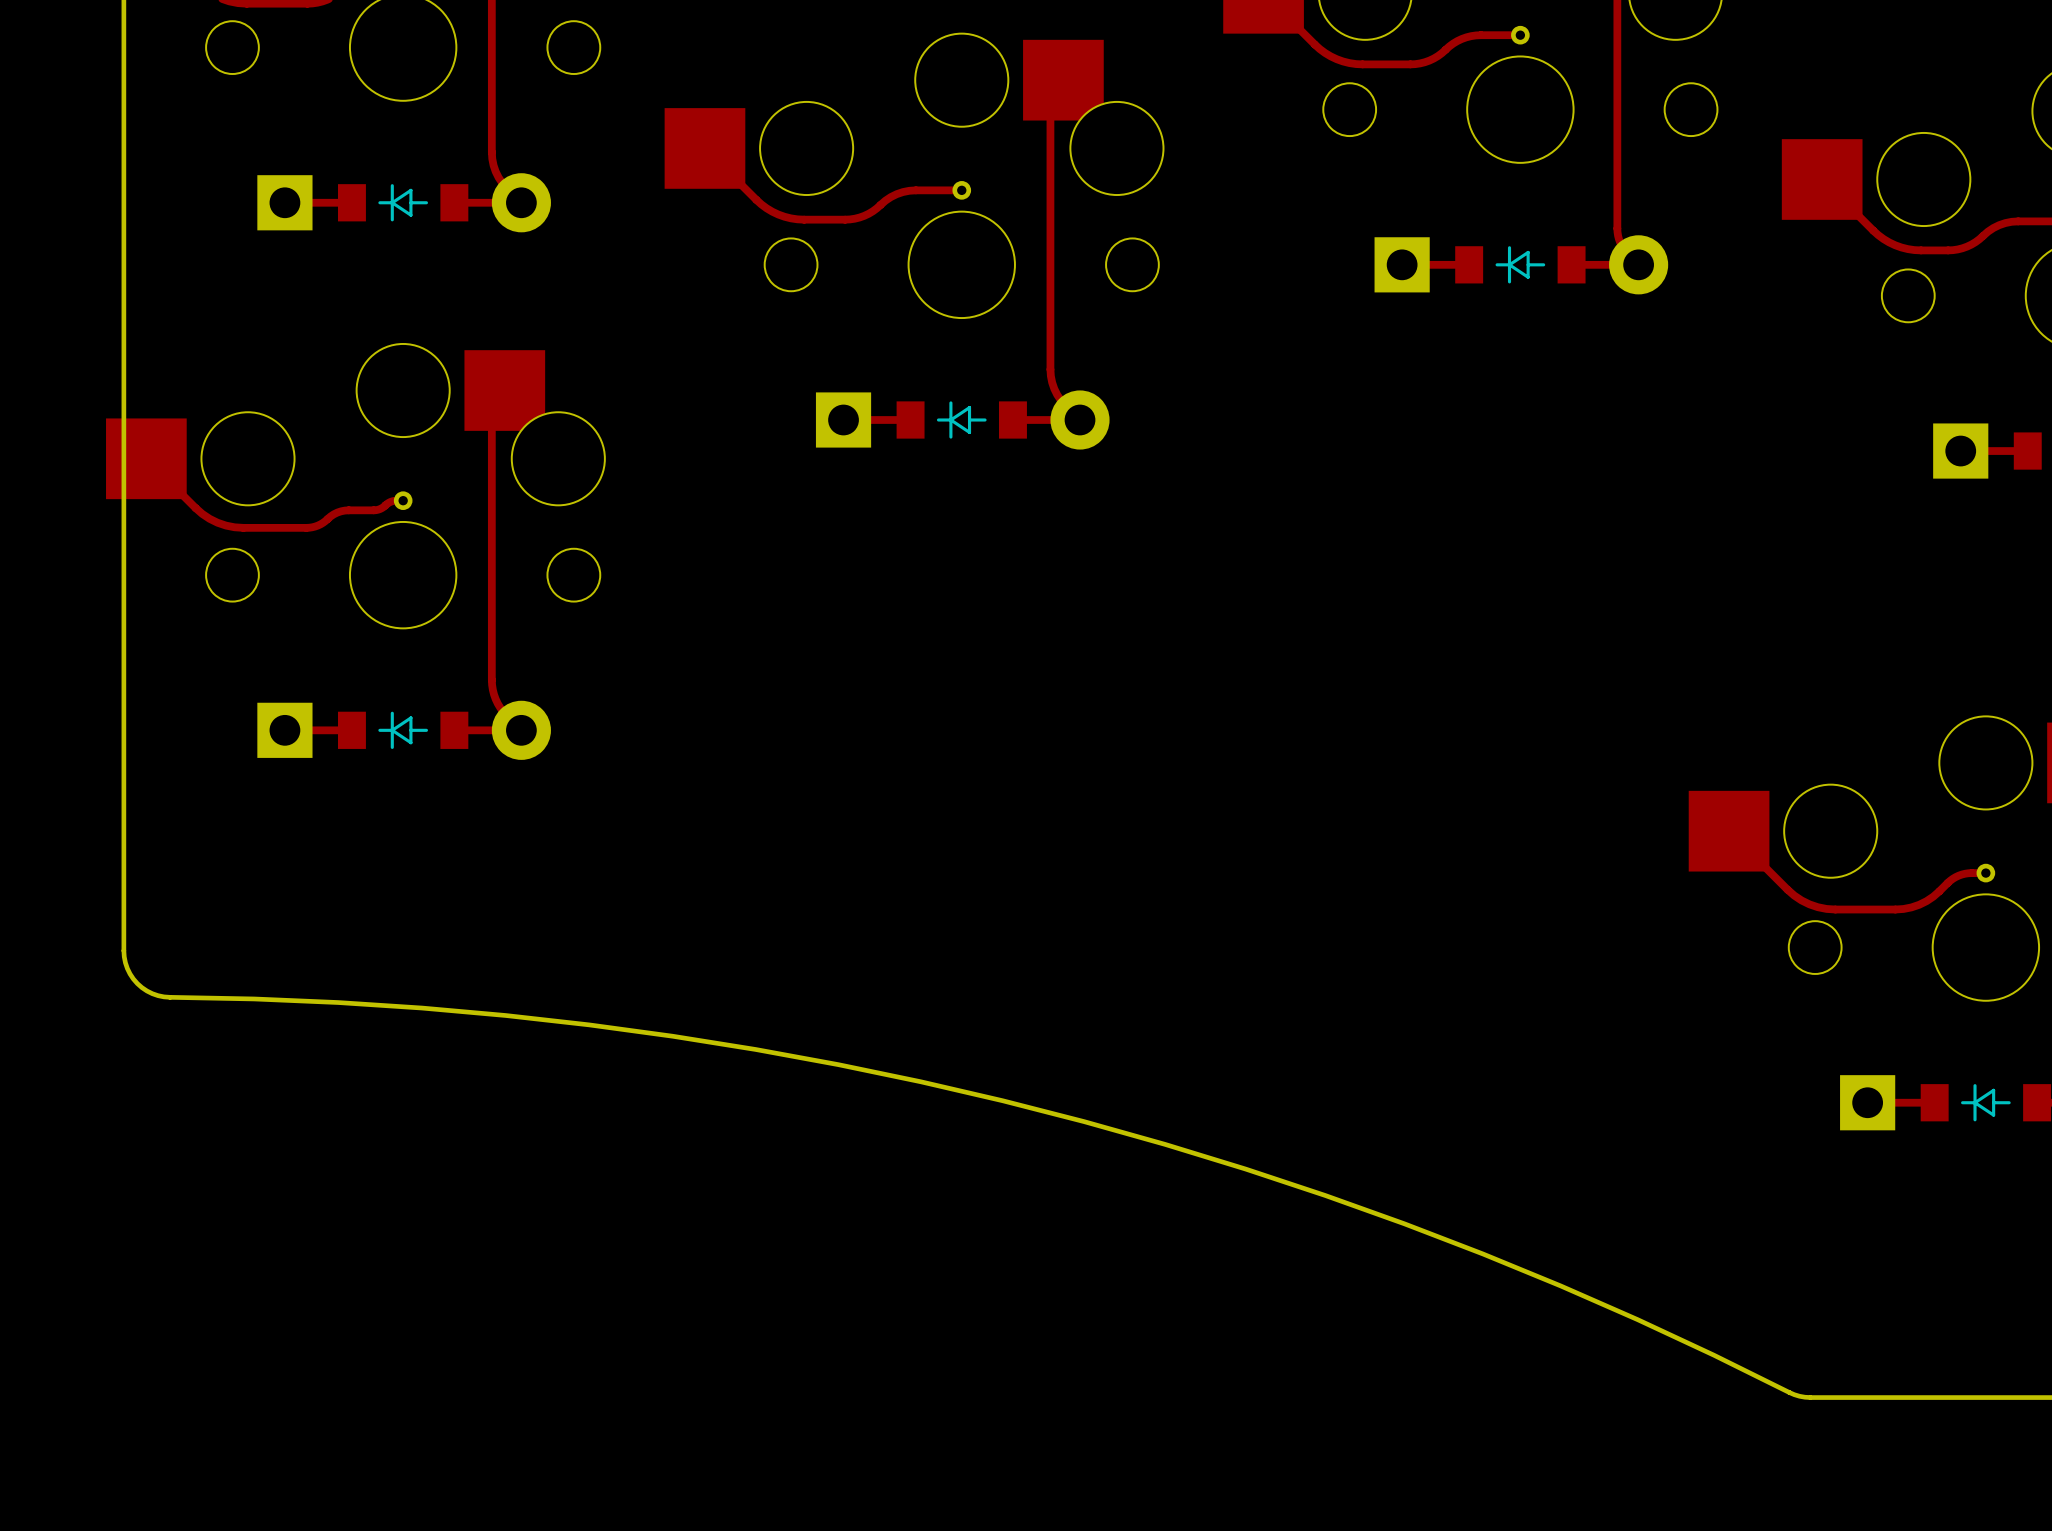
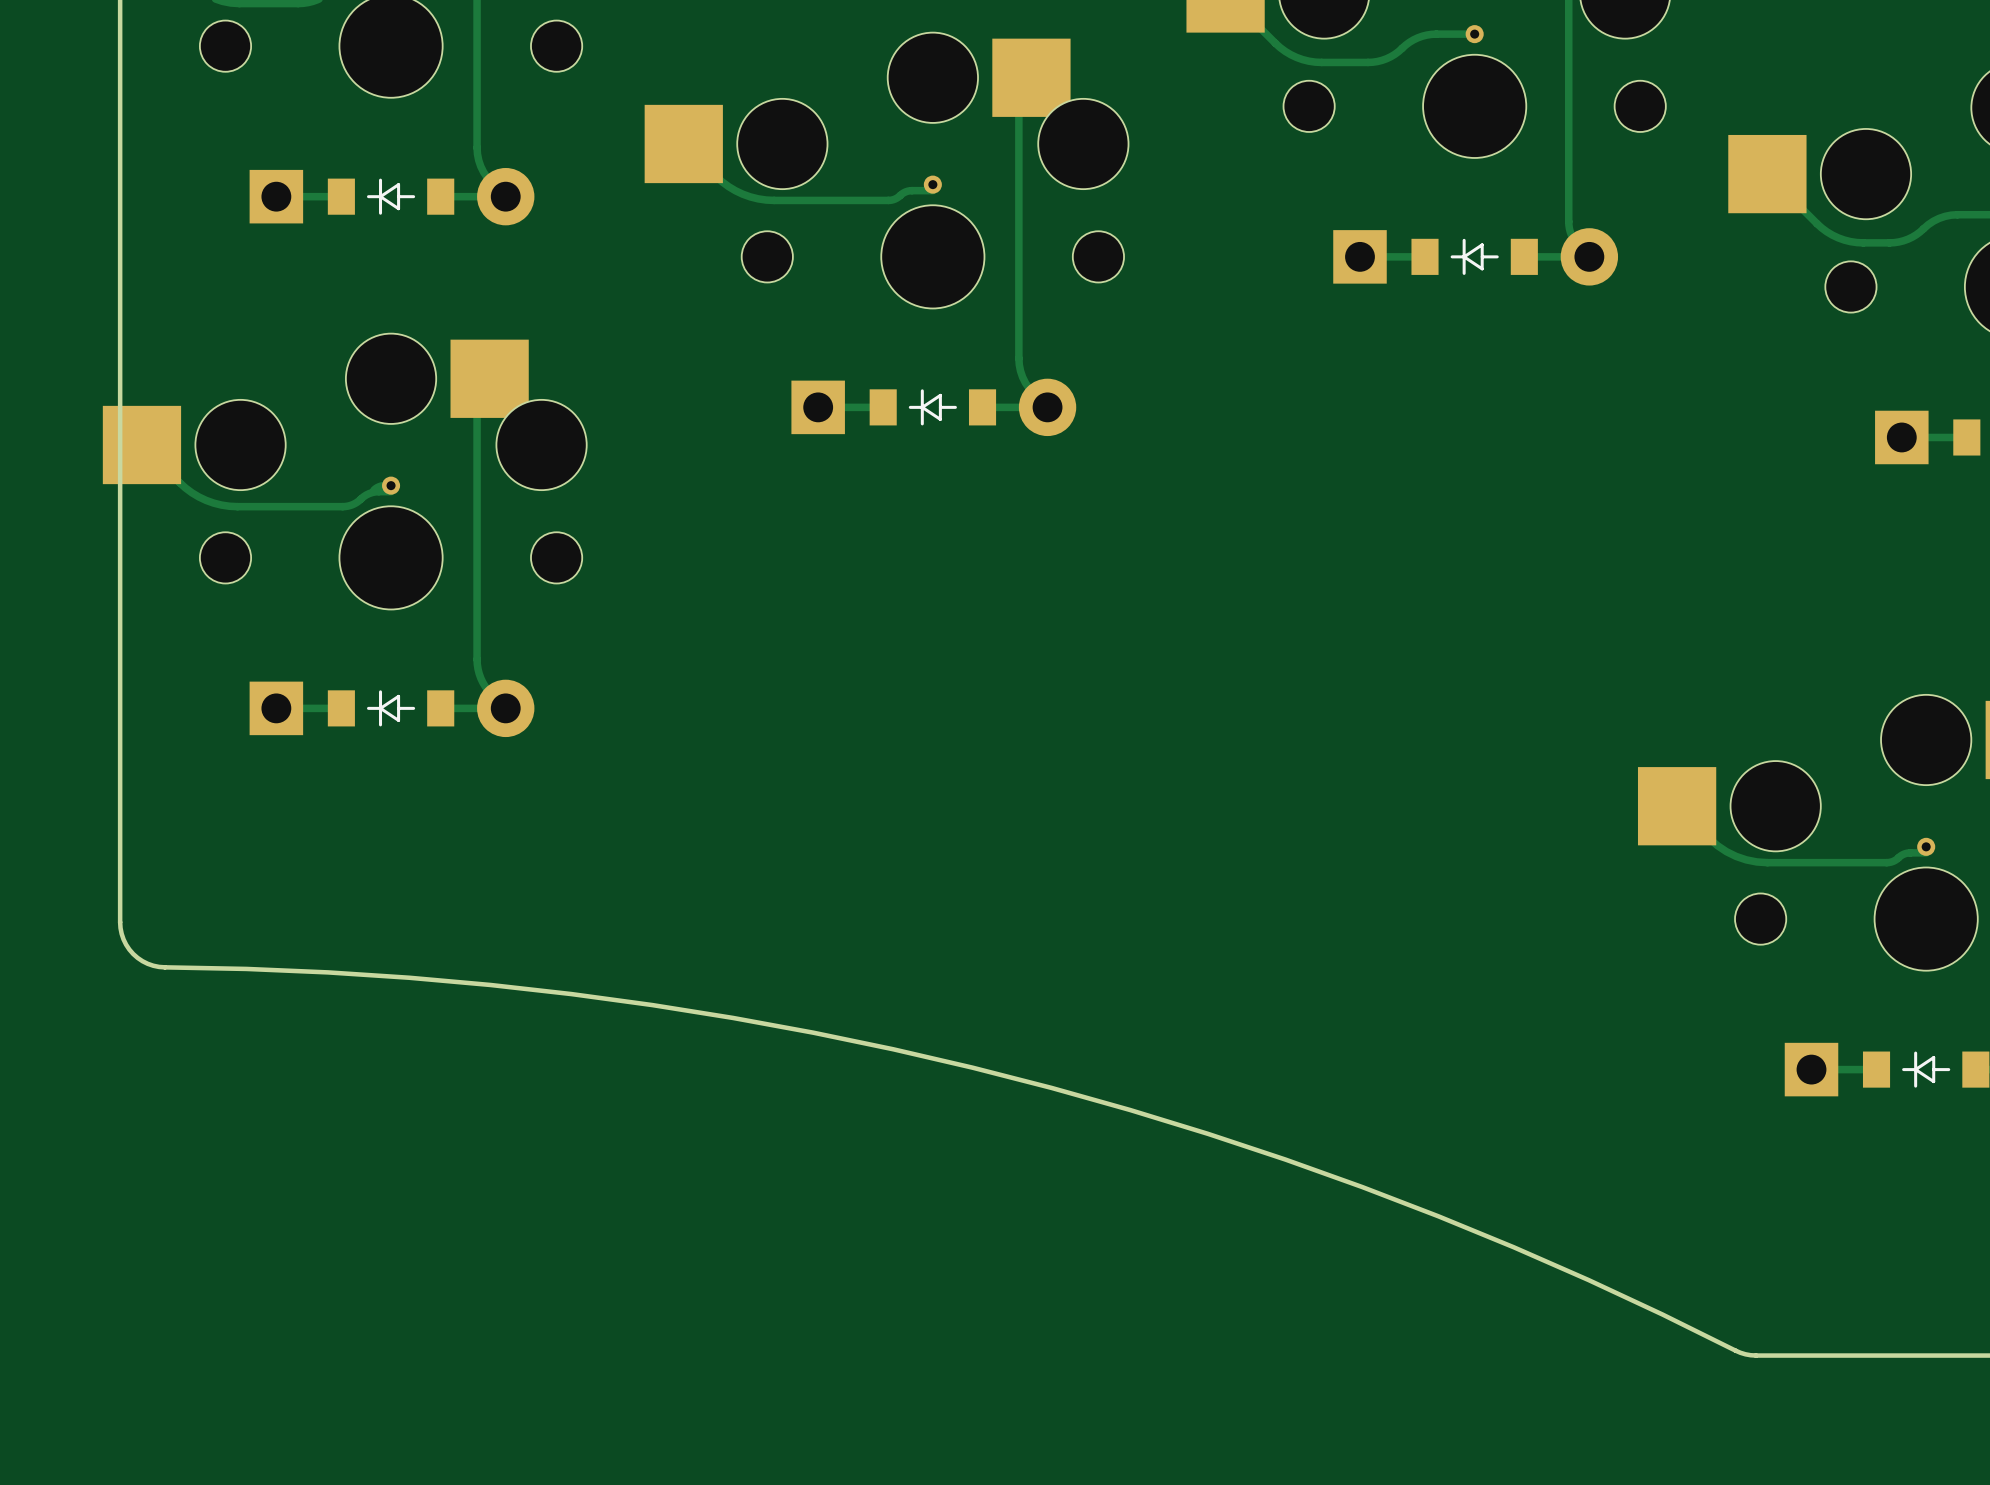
track: (738, 181) (761, 204) (772, 211) (790, 218) (804, 219) (845, 219) (859, 217) (872, 211) (890, 197) (909, 190) (961, 190) -> (716, 176) (735, 190) (750, 196) (766, 200) (890, 200) (907, 191) (932, 190)
track: (185, 497) (209, 518) (225, 525) (243, 527) (312, 527) (341, 511) (375, 510) (385, 505) -> (179, 482) (192, 492) (206, 500) (221, 505) (237, 506) (345, 506) (354, 503) (372, 492) (391, 491)
track: (1762, 864) (1787, 889) (1801, 900) (1817, 907) (1835, 909) (1895, 909) (1911, 907) (1933, 896) (1958, 875) (1985, 873) -> (1709, 838) (1726, 851) (1756, 861) (1886, 862) (1893, 861) (1907, 853) (1926, 852)

